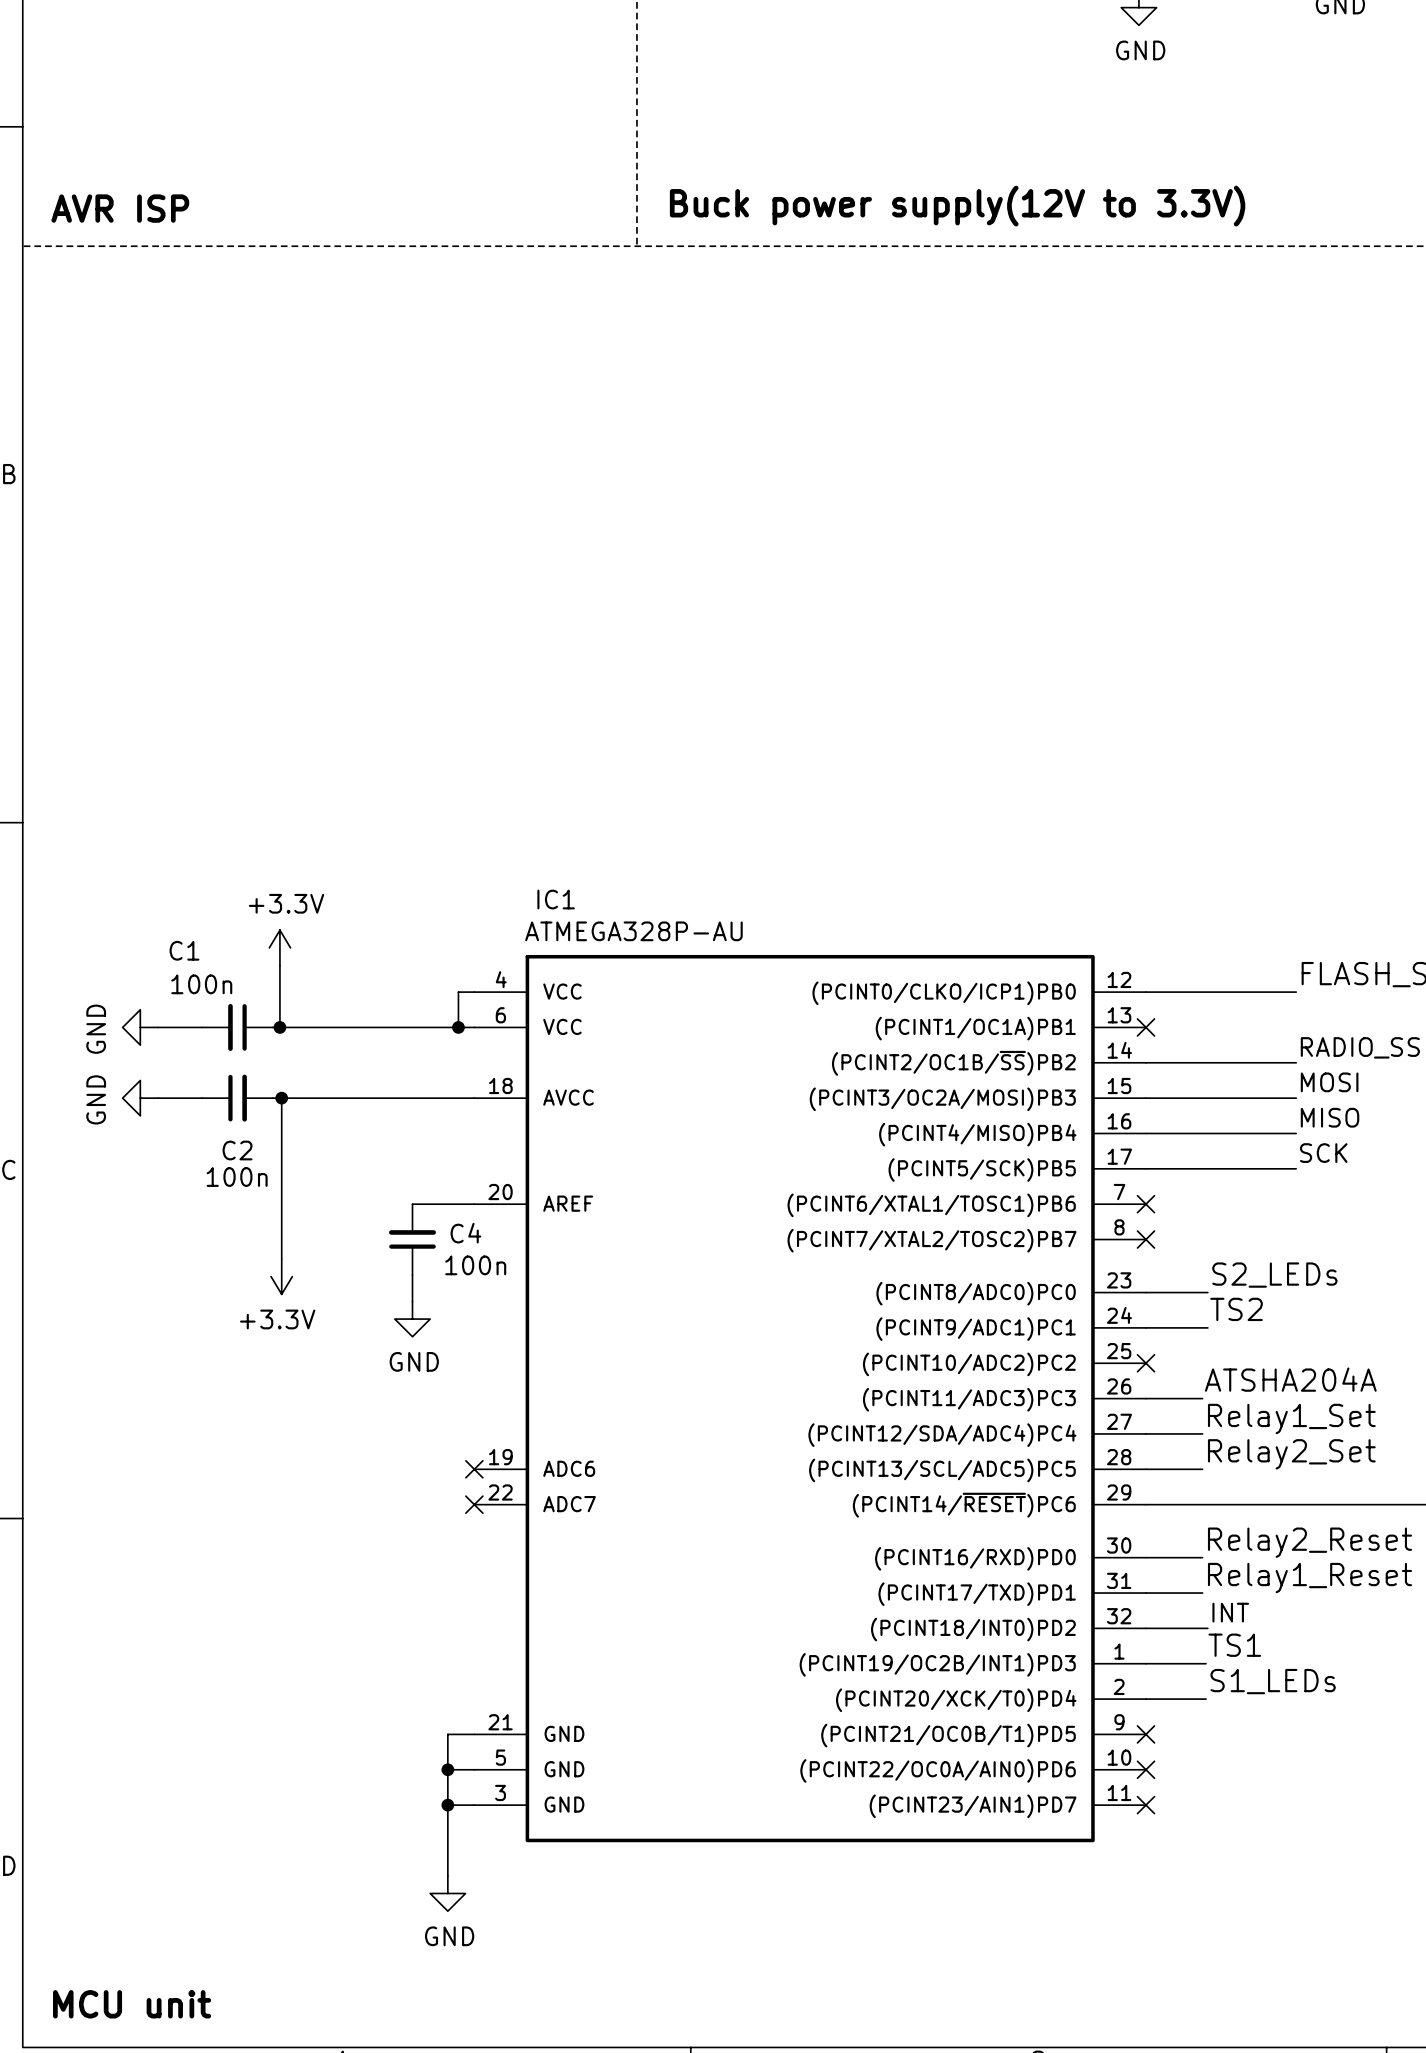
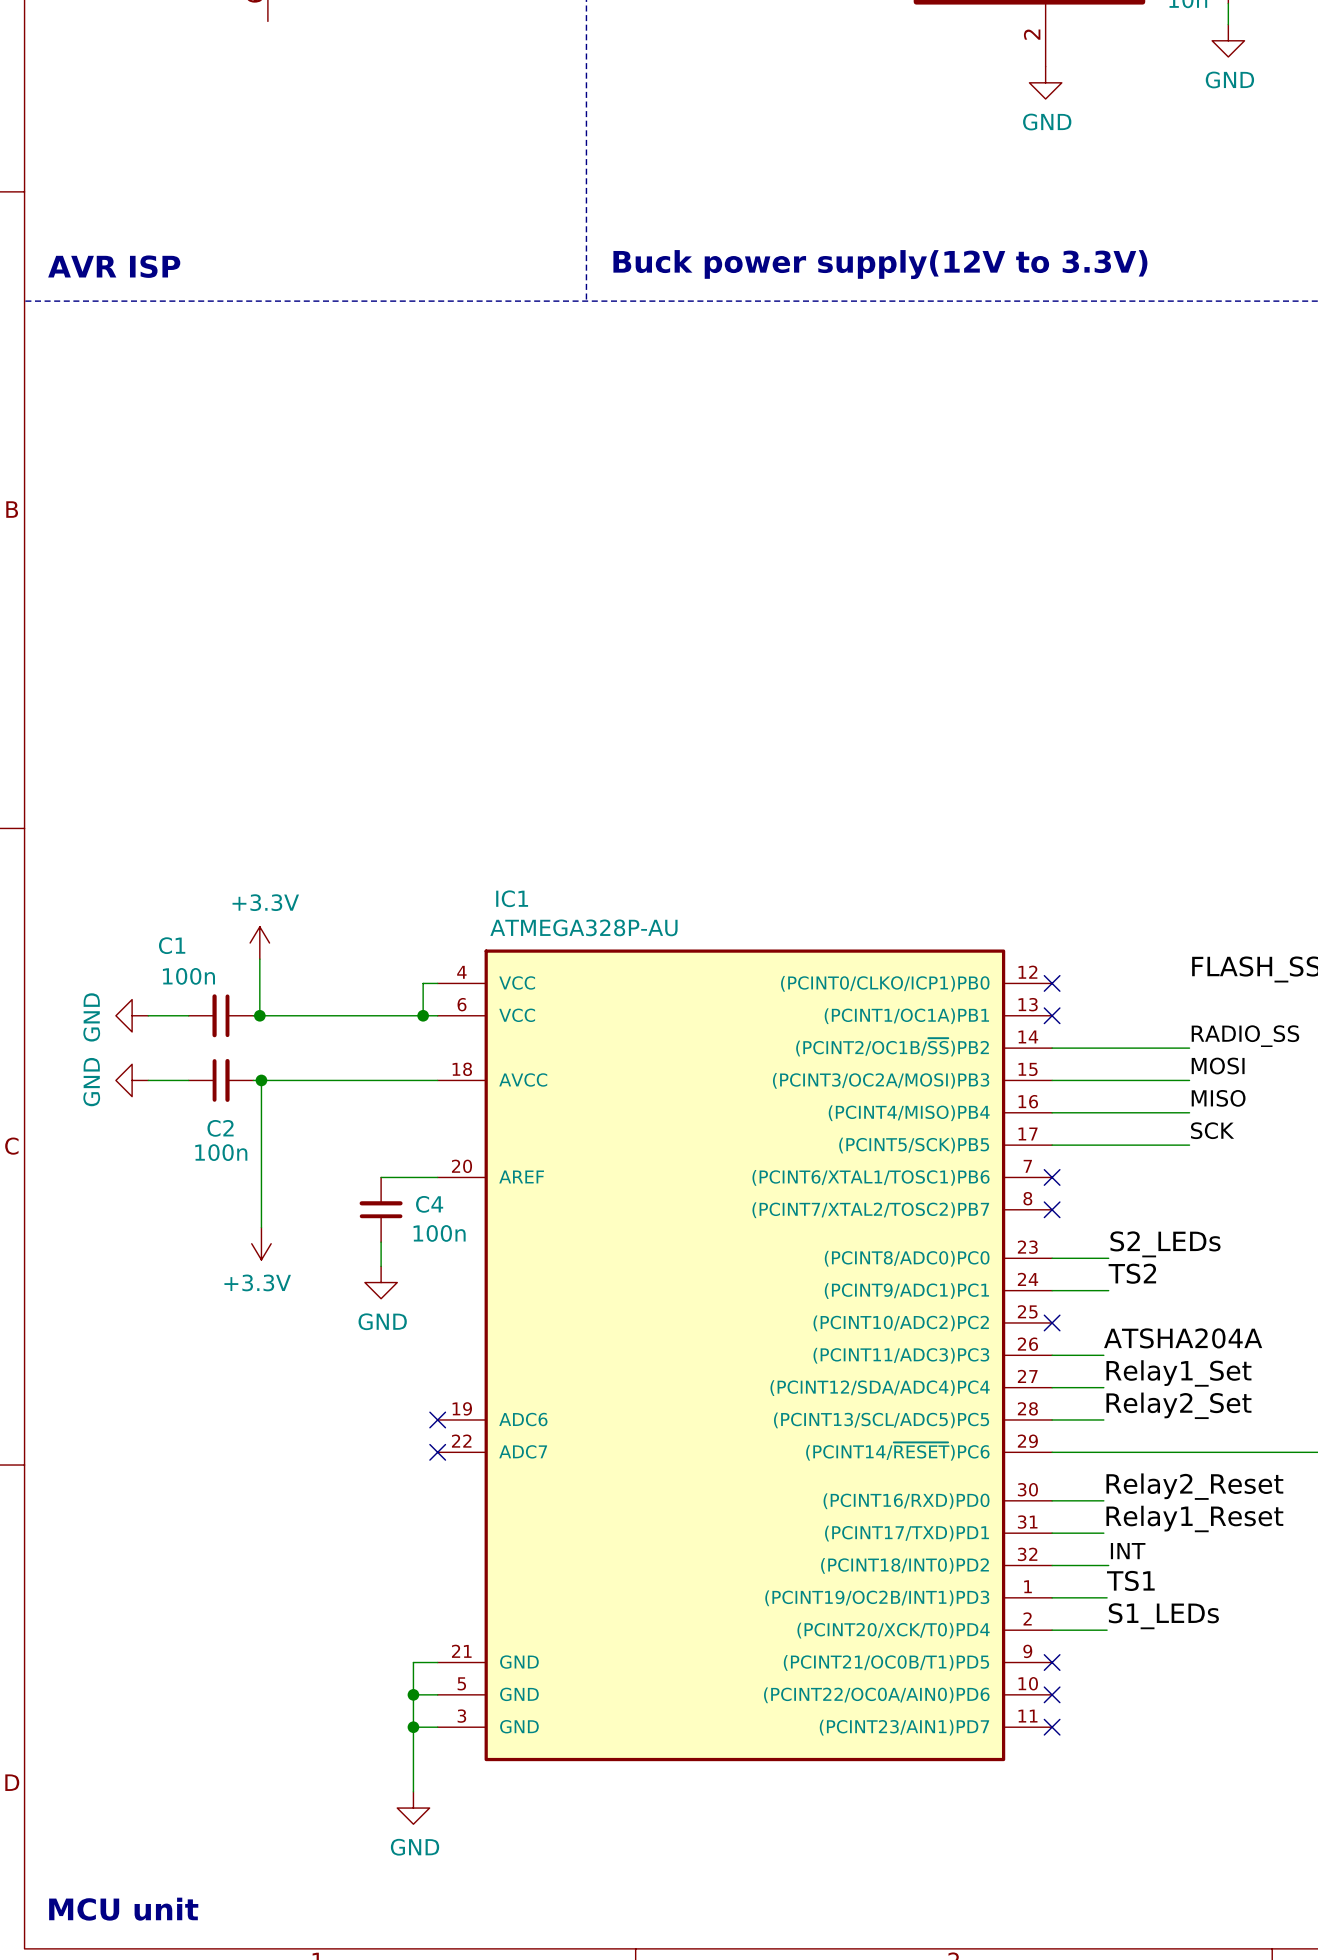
wire: (1145, 992) (1296, 992) -> none
no-connect mark: none -> (1052, 983)

